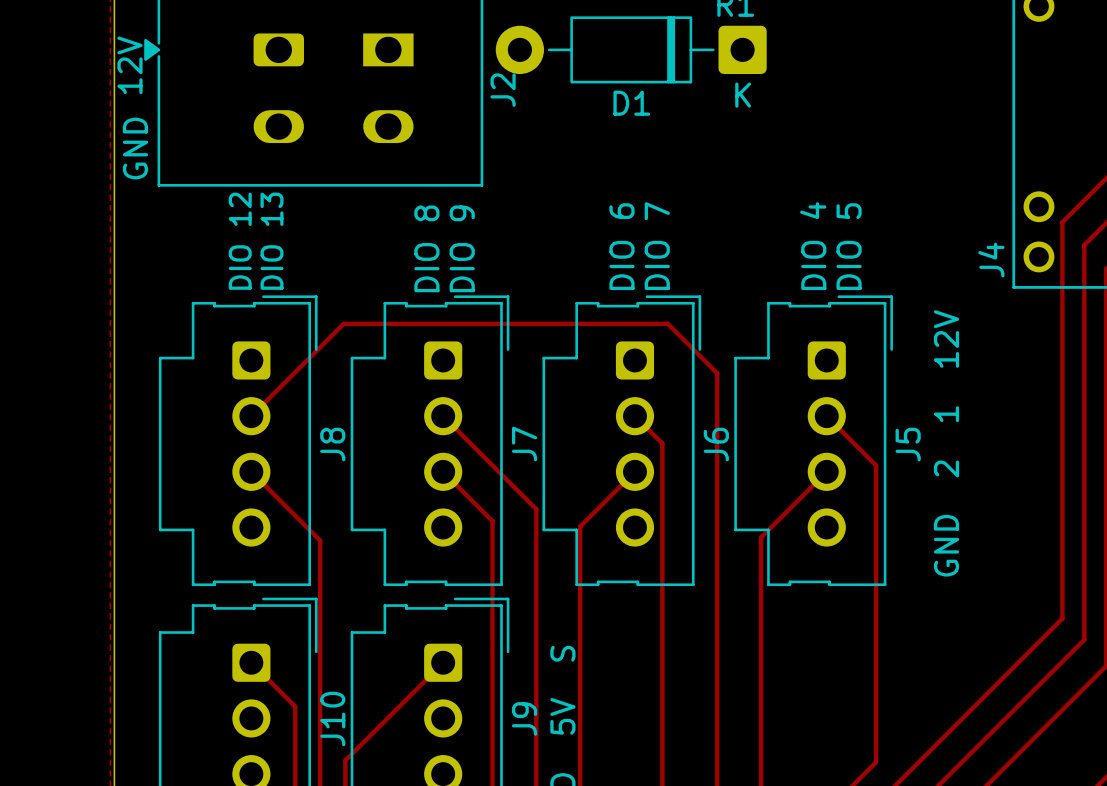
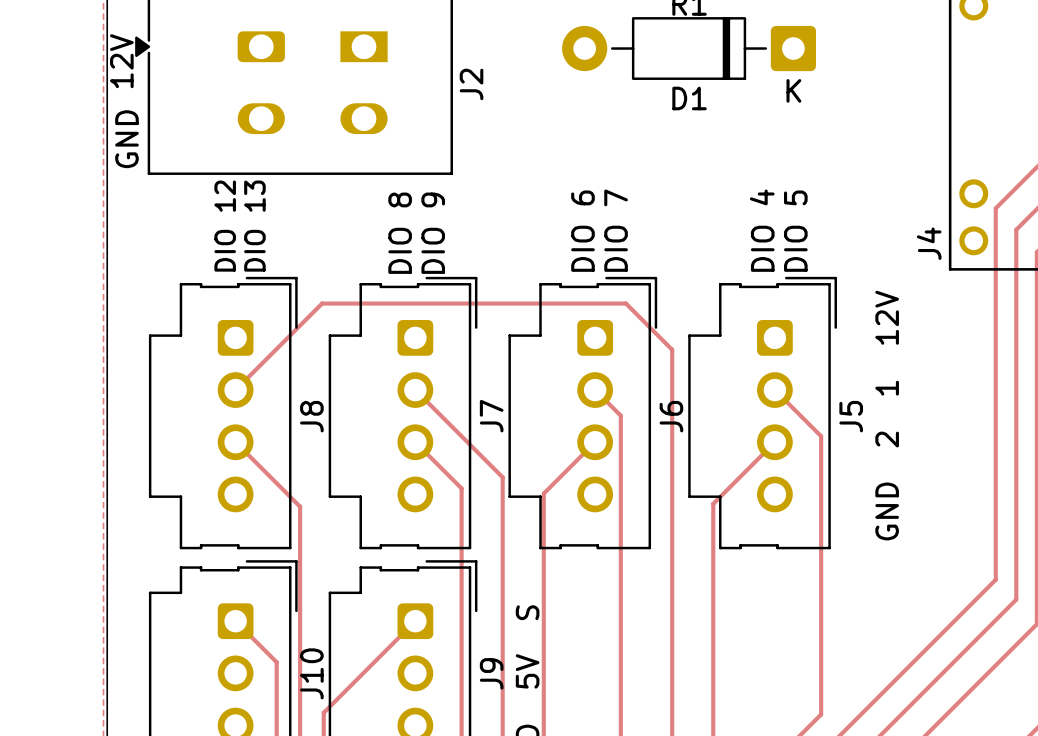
D1 position: (631, 49) -> (689, 48)

